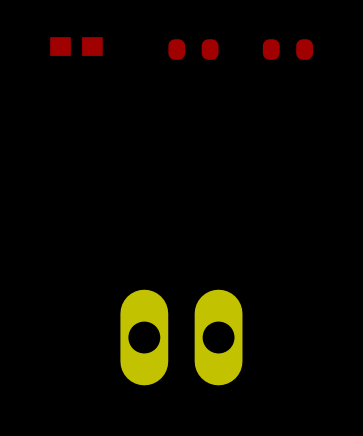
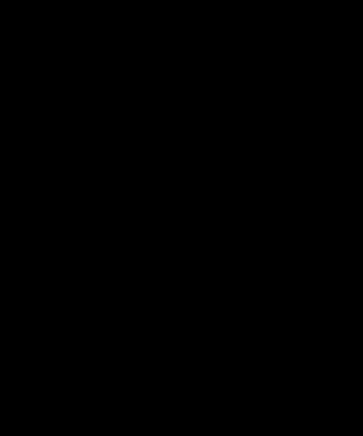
part: (76, 46) -> none
part: (193, 49) -> none
part: (287, 49) -> none
part: (181, 337) -> none

